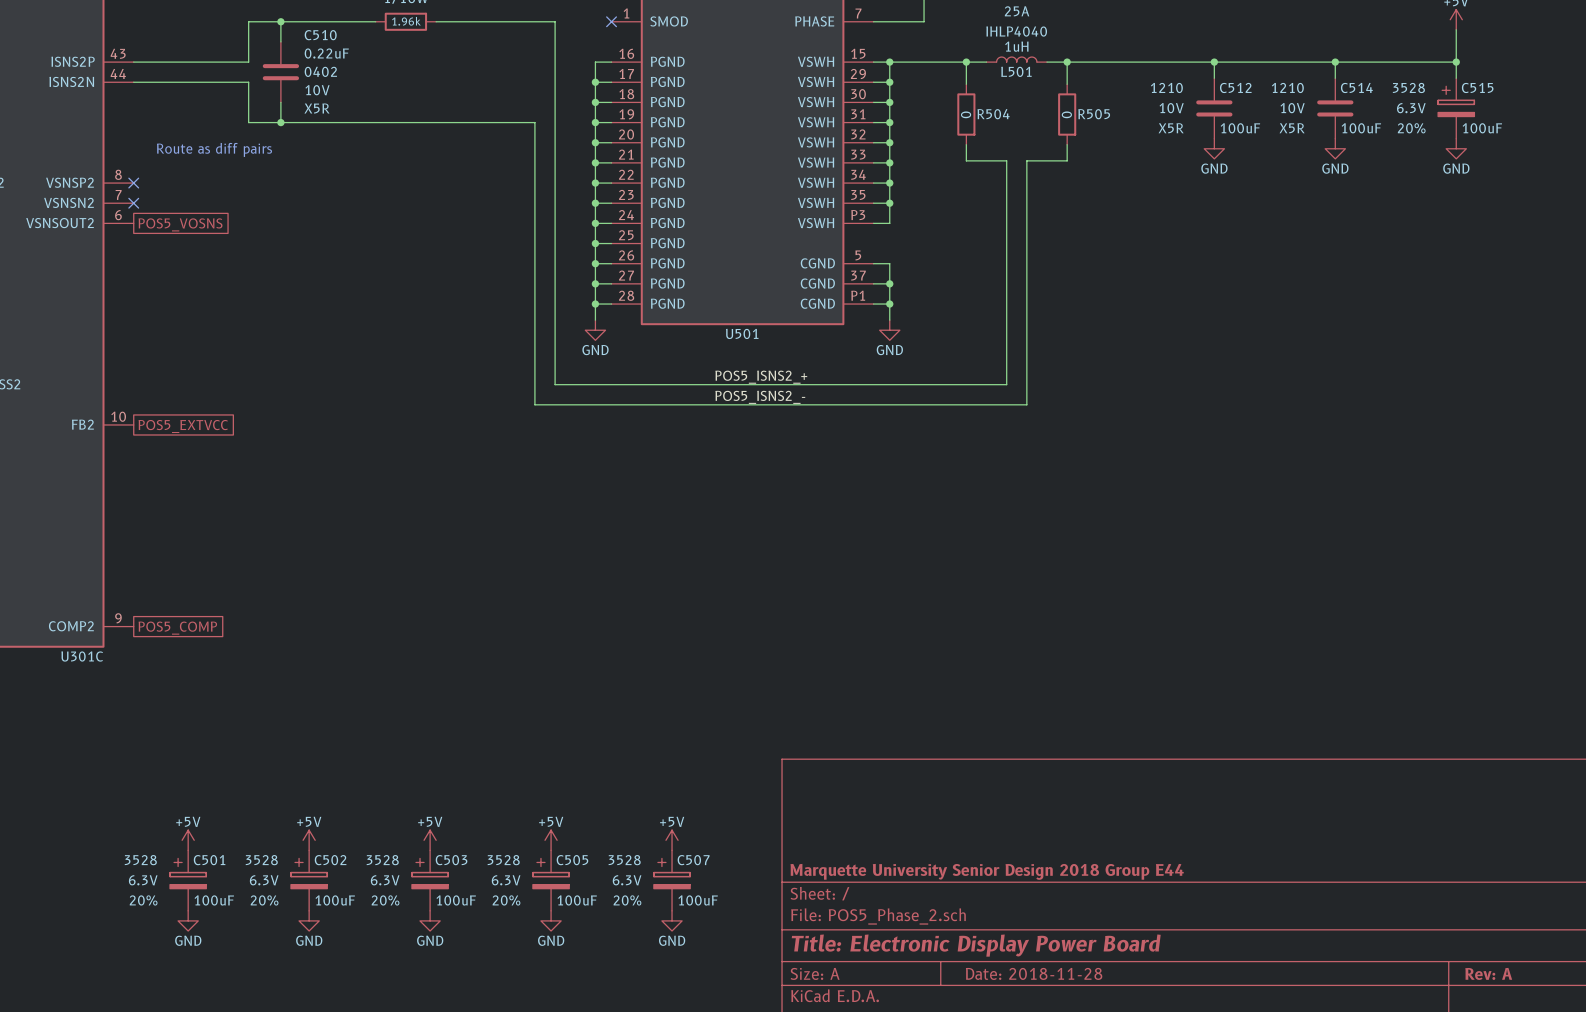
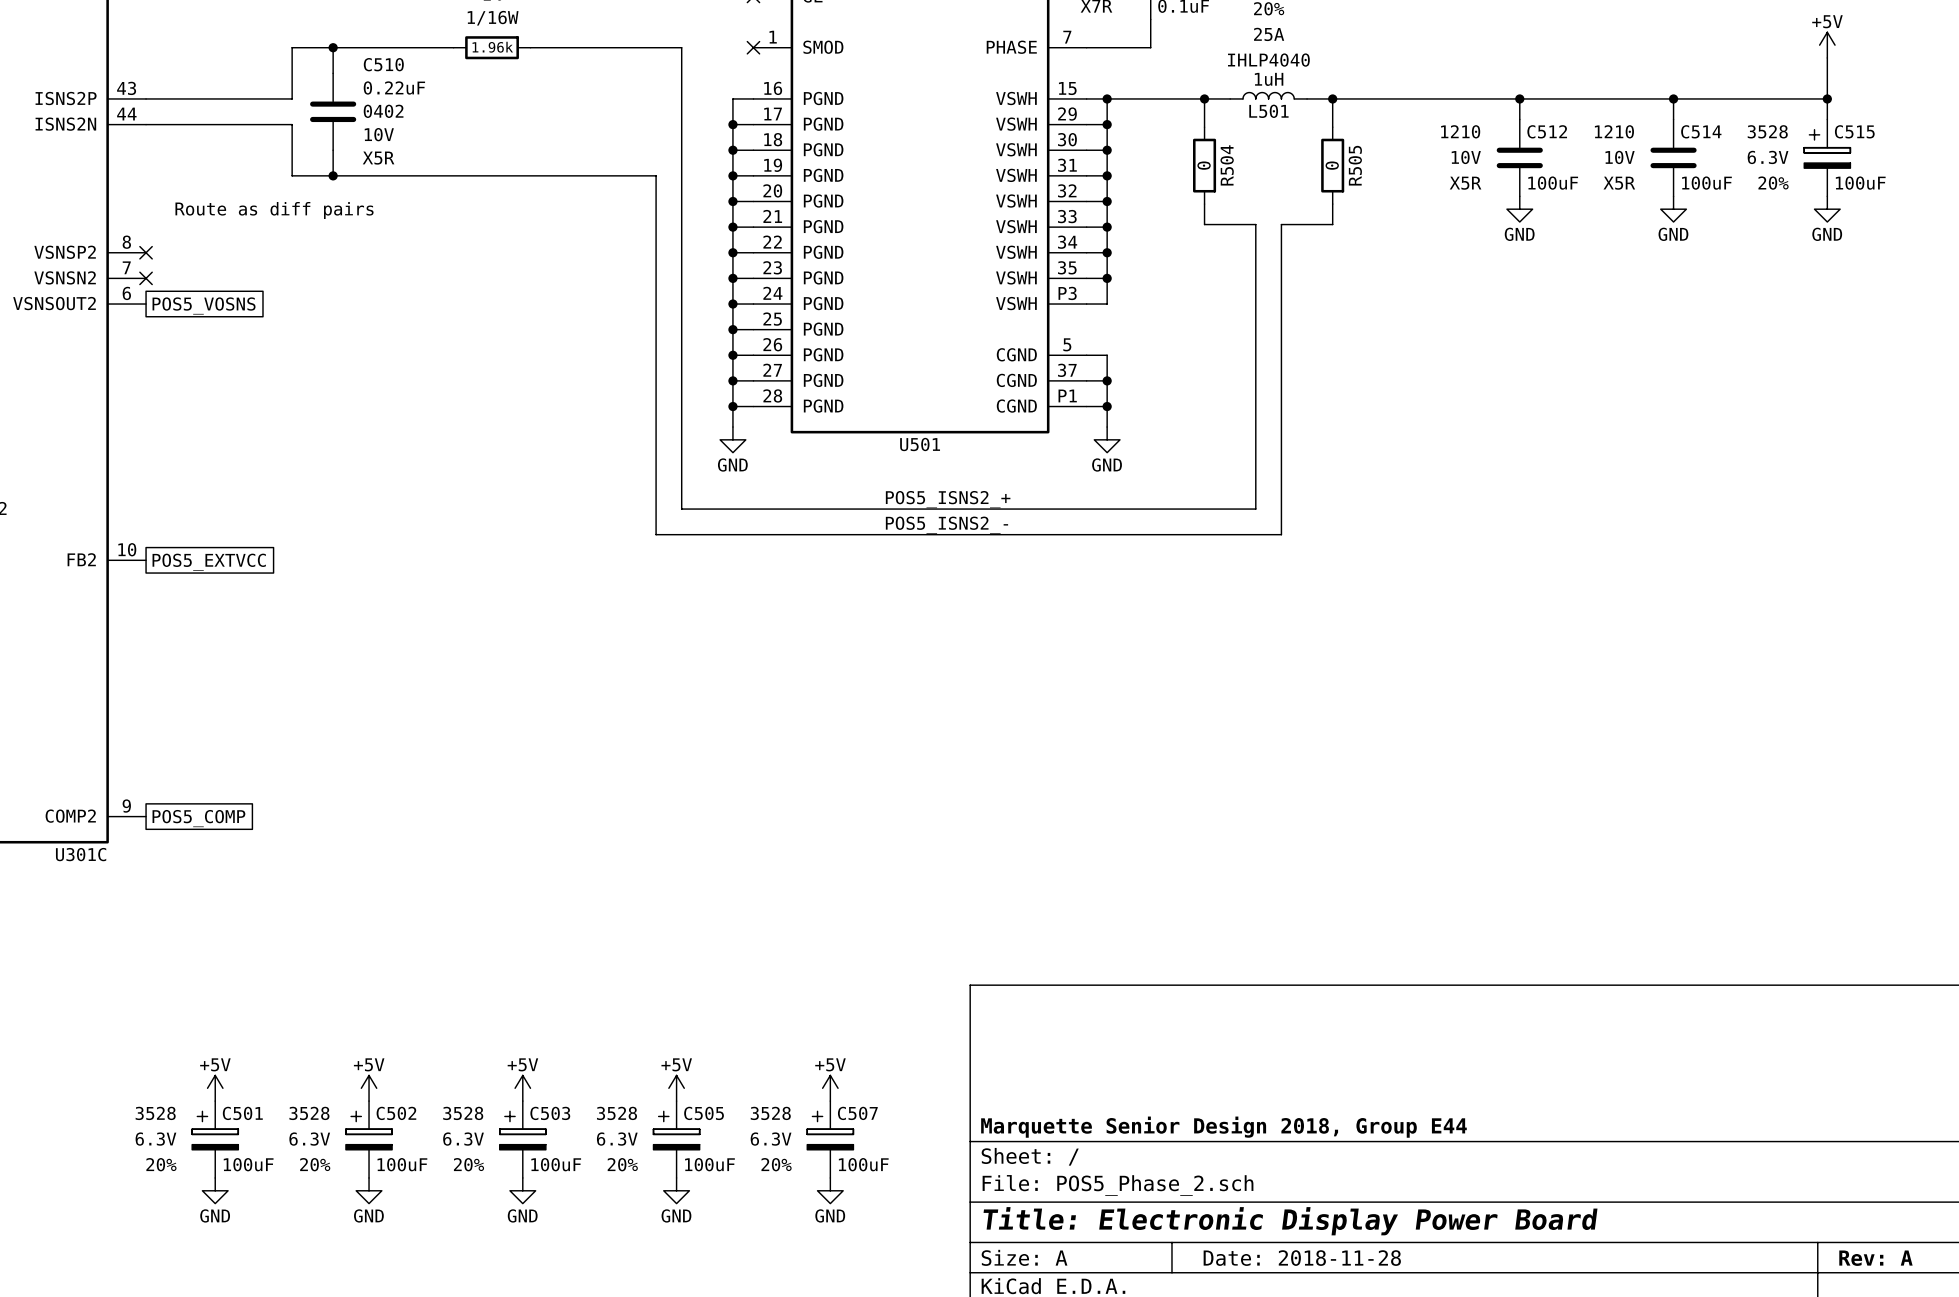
R504 name rotation: 0° (993, 114) -> 90° counterclockwise (1227, 165)
R505 name rotation: 0° (1094, 114) -> 90° counterclockwise (1355, 165)
title block: Marquette University Senior Design 2018 Group E44 (987, 871) -> Marquette Senior Design 2018, Group E44 (1223, 1127)

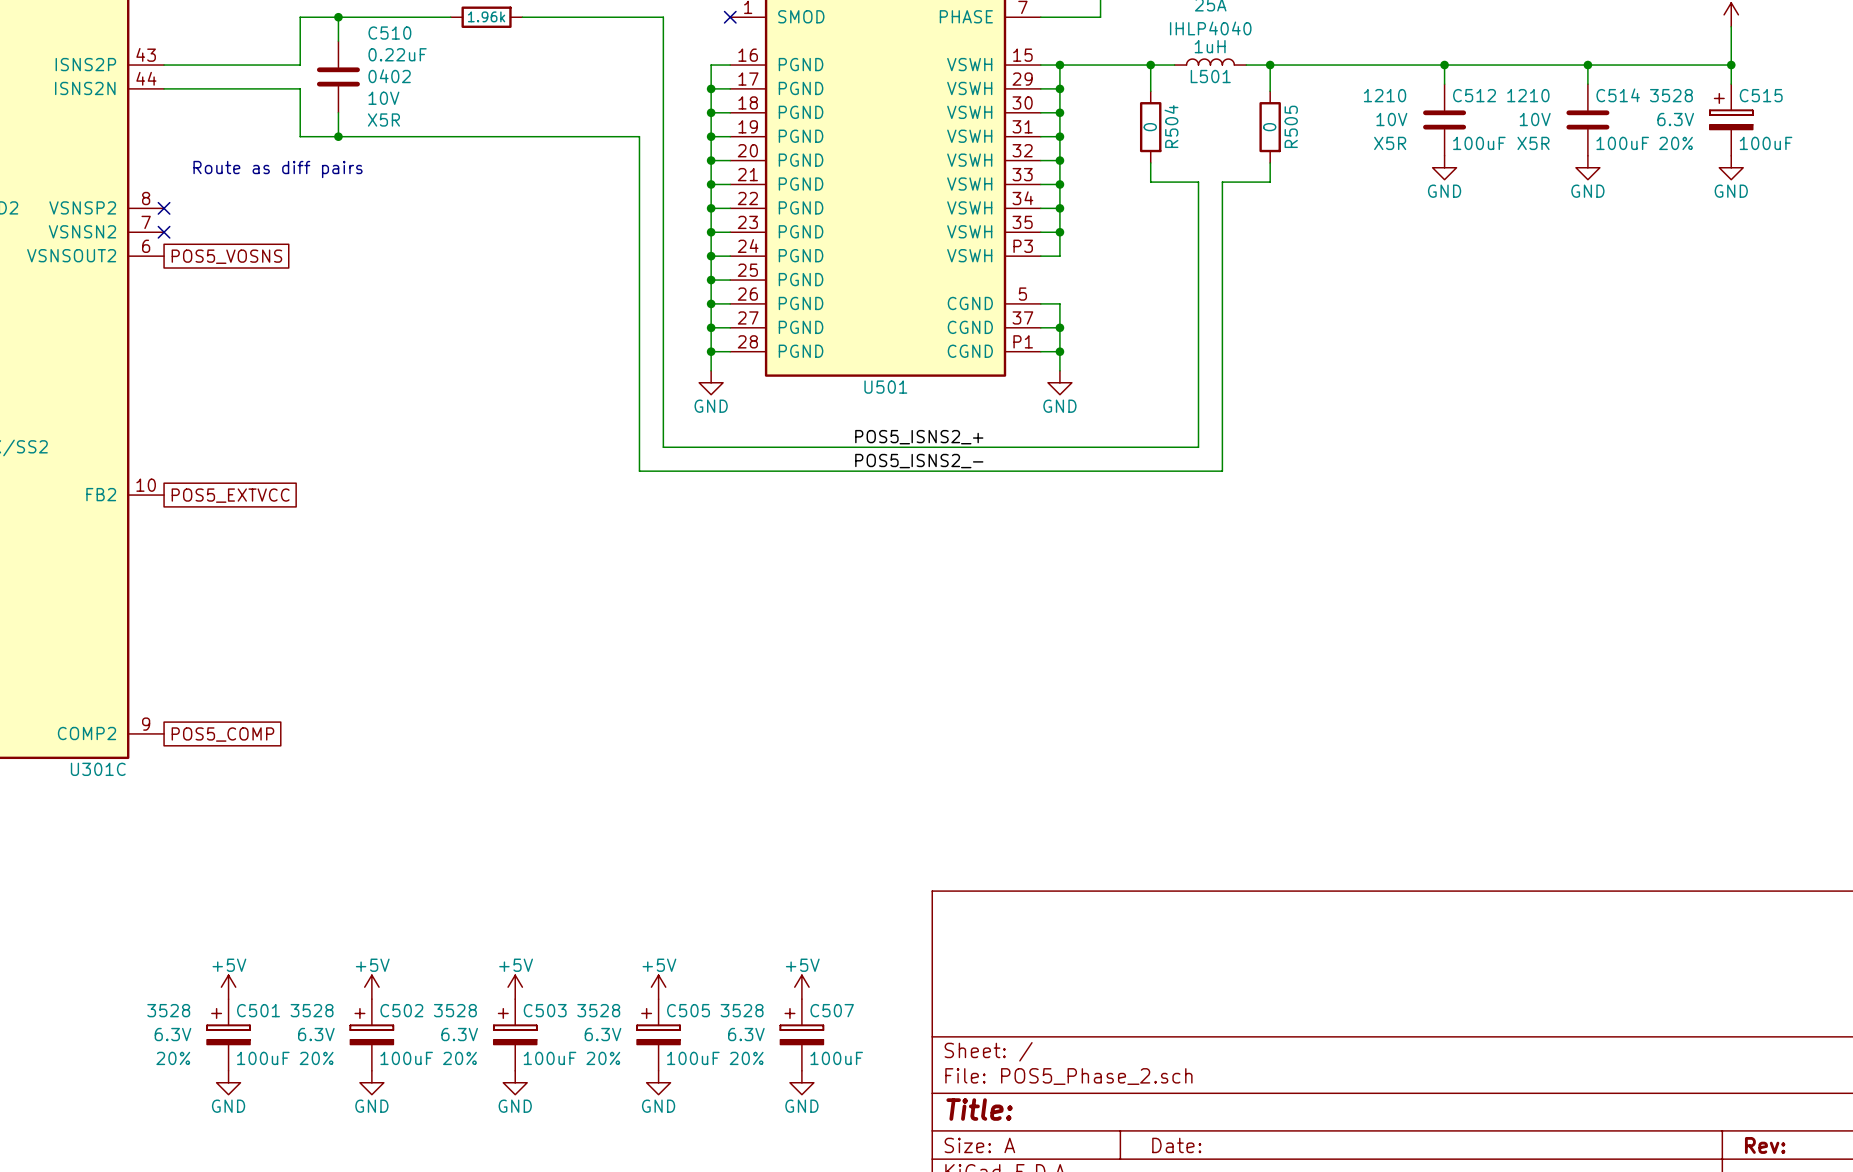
title block: Marquette Senior Design 2018, Group E44 (1223, 1127) -> none
title block: Title: Electronic Display Power Board (1290, 1221) -> Title: (979, 1109)
title block: Date: 2018-11-28 (1302, 1258) -> Date: (1176, 1145)
title block: Rev: A (1875, 1258) -> Rev: (1765, 1145)

